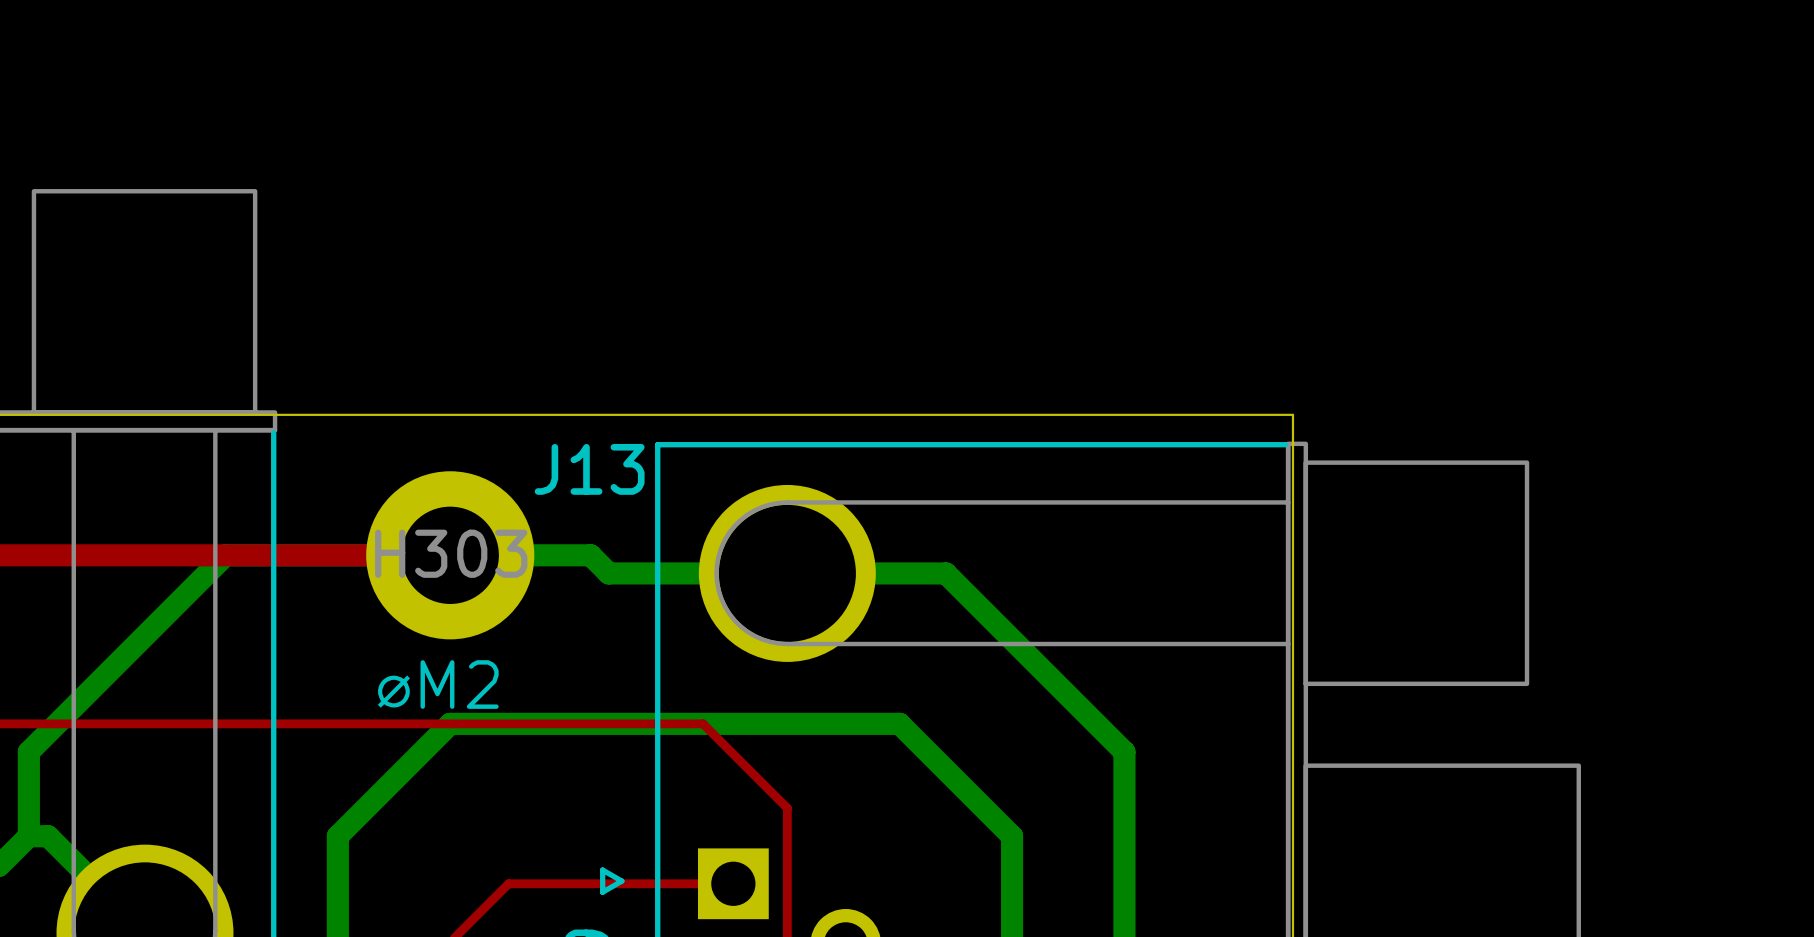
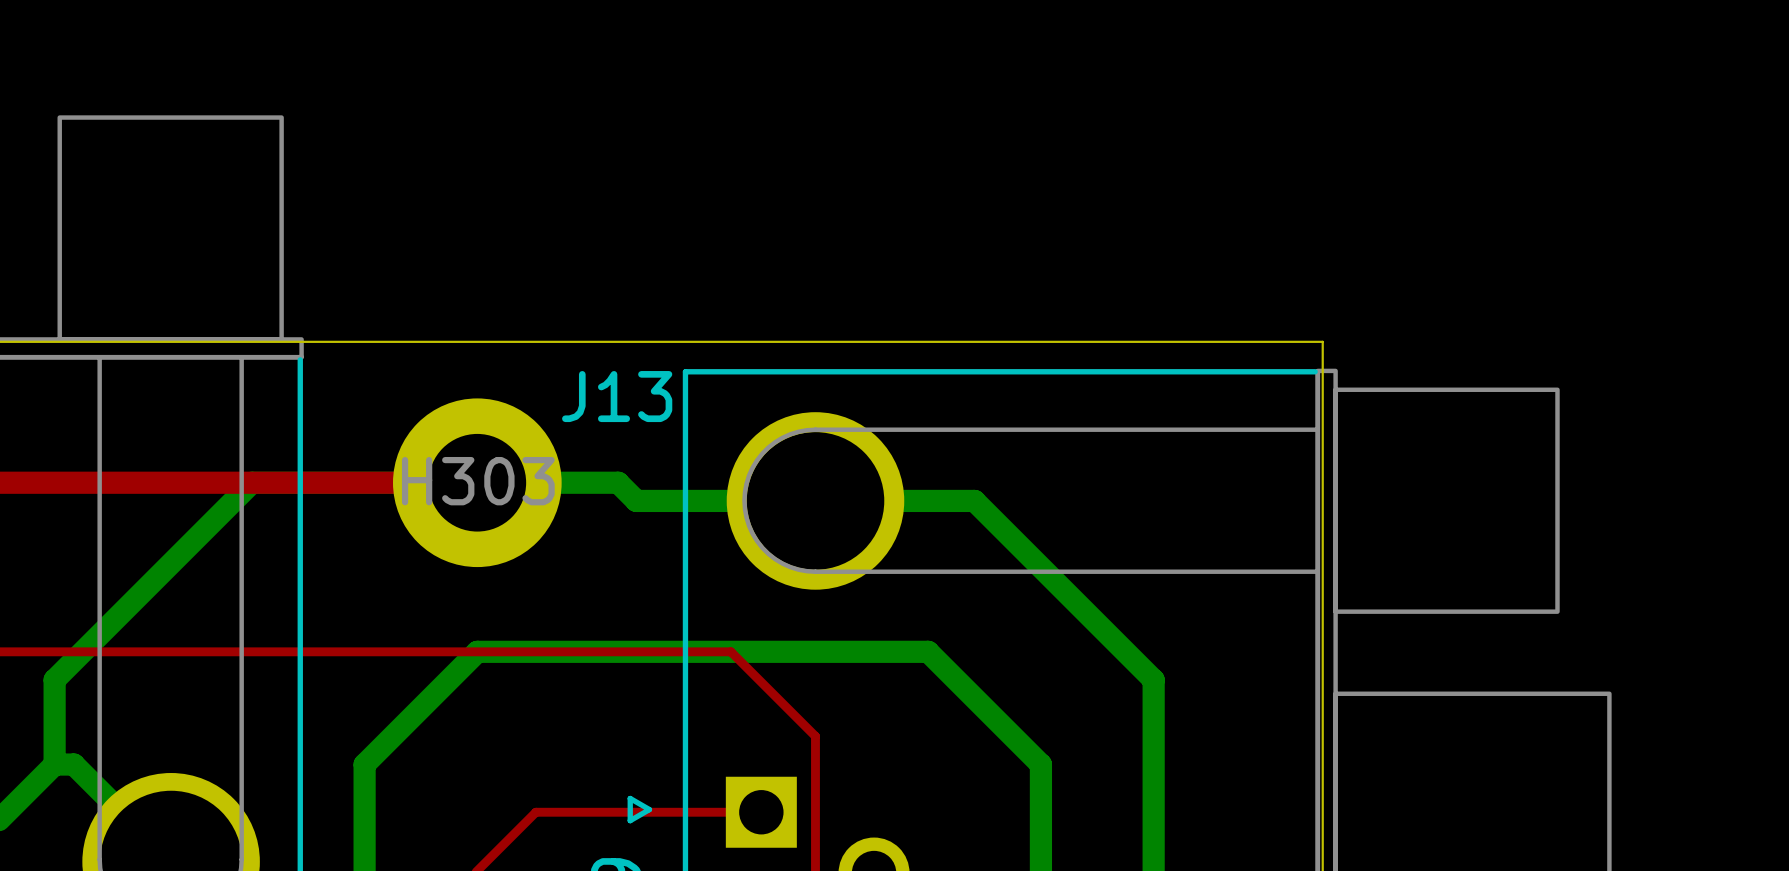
text: ⌀M2 (437, 685) -> none

